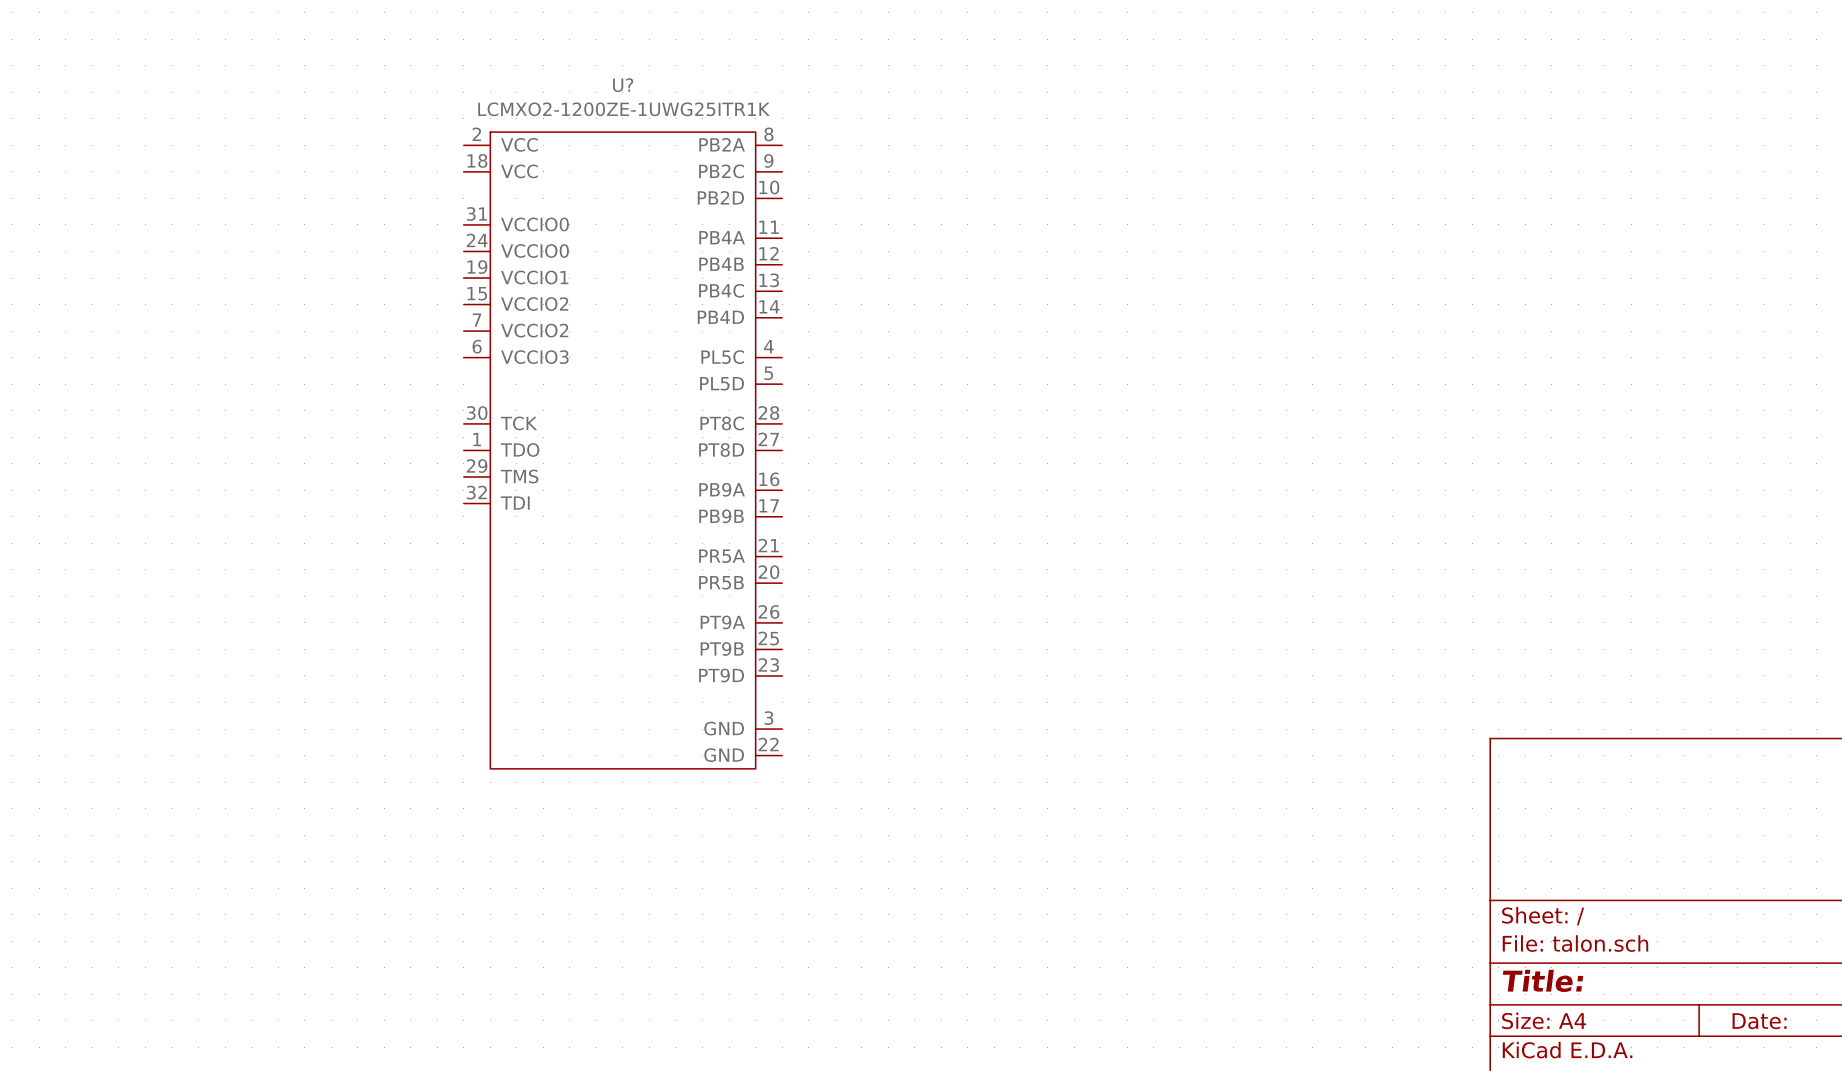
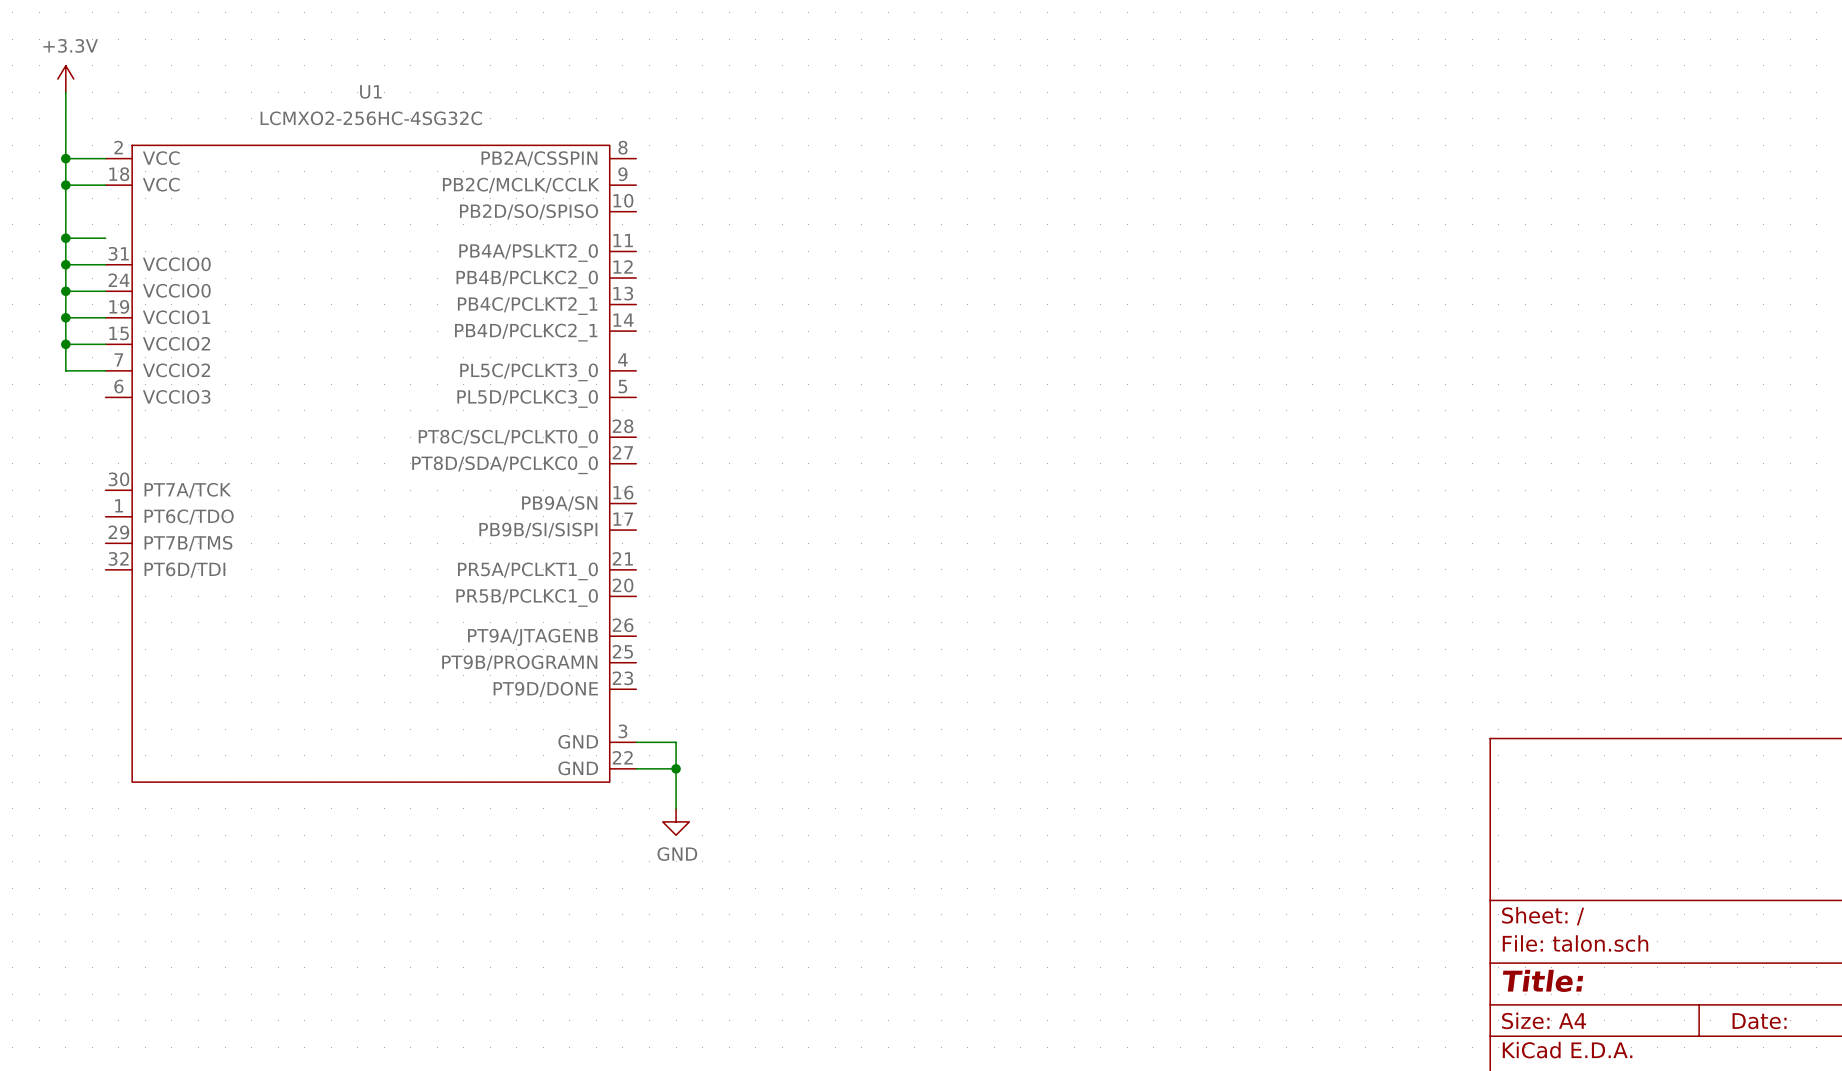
power symbol: none -> +3.3V (65, 79)
wire: none -> (65, 92) (65, 370) (105, 370)
wire: none -> (65, 158) (105, 158)
junction: none -> (65, 158)
wire: none -> (65, 185) (105, 185)
junction: none -> (65, 185)
wire: none -> (65, 238) (105, 238)
junction: none -> (65, 238)
wire: none -> (65, 264) (105, 264)
junction: none -> (65, 264)
wire: none -> (65, 291) (105, 291)
junction: none -> (65, 291)
wire: none -> (65, 317) (105, 317)
junction: none -> (65, 317)
wire: none -> (65, 344) (105, 344)
junction: none -> (65, 344)
U?: LCMXO2-1200ZE-1UWG25ITR1K (622, 450) -> none
U1: none -> LCMXO2-256HC-4SG32C (370, 463)
wire: none -> (636, 742) (676, 742) (676, 808)
junction: none -> (676, 768)
power symbol: none -> GND (676, 821)

